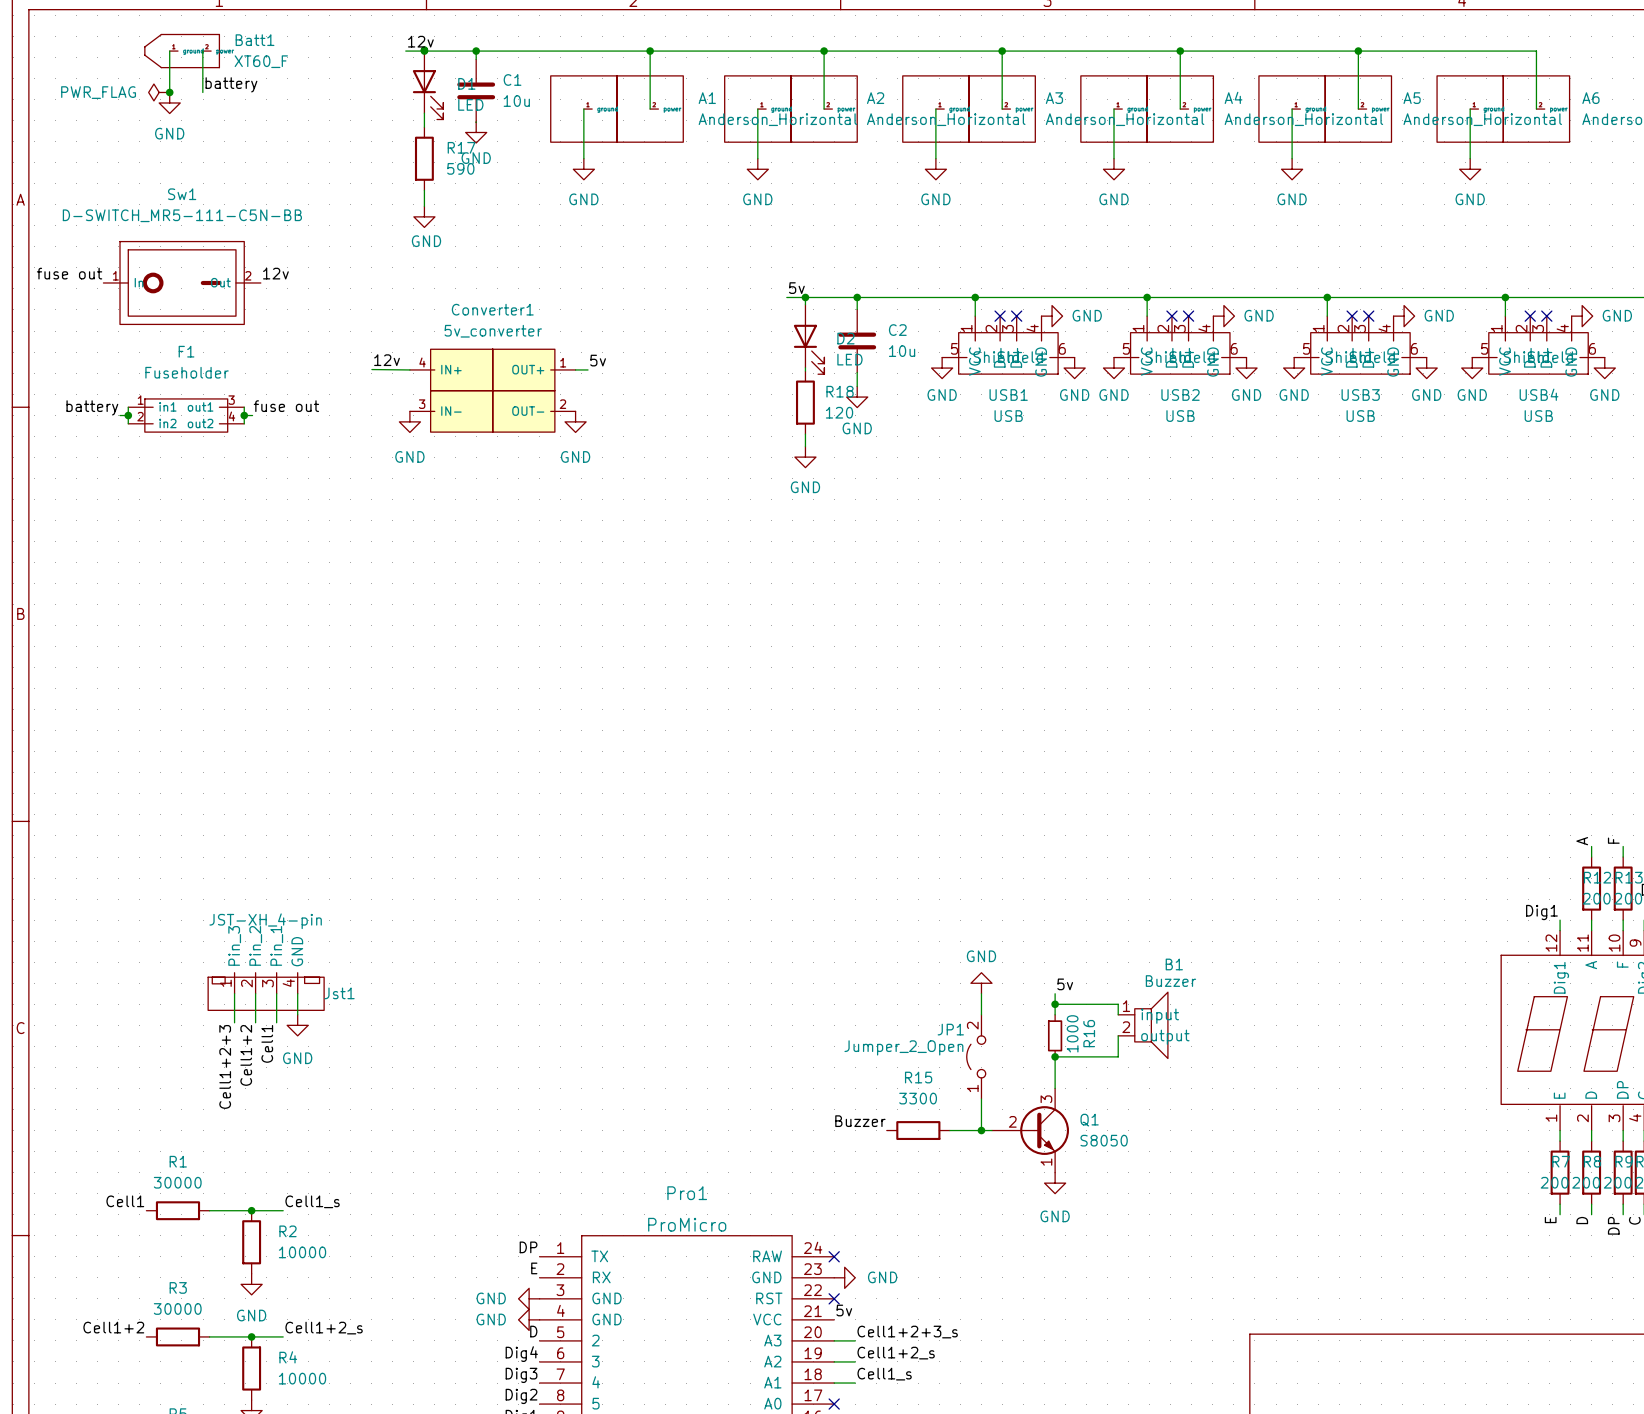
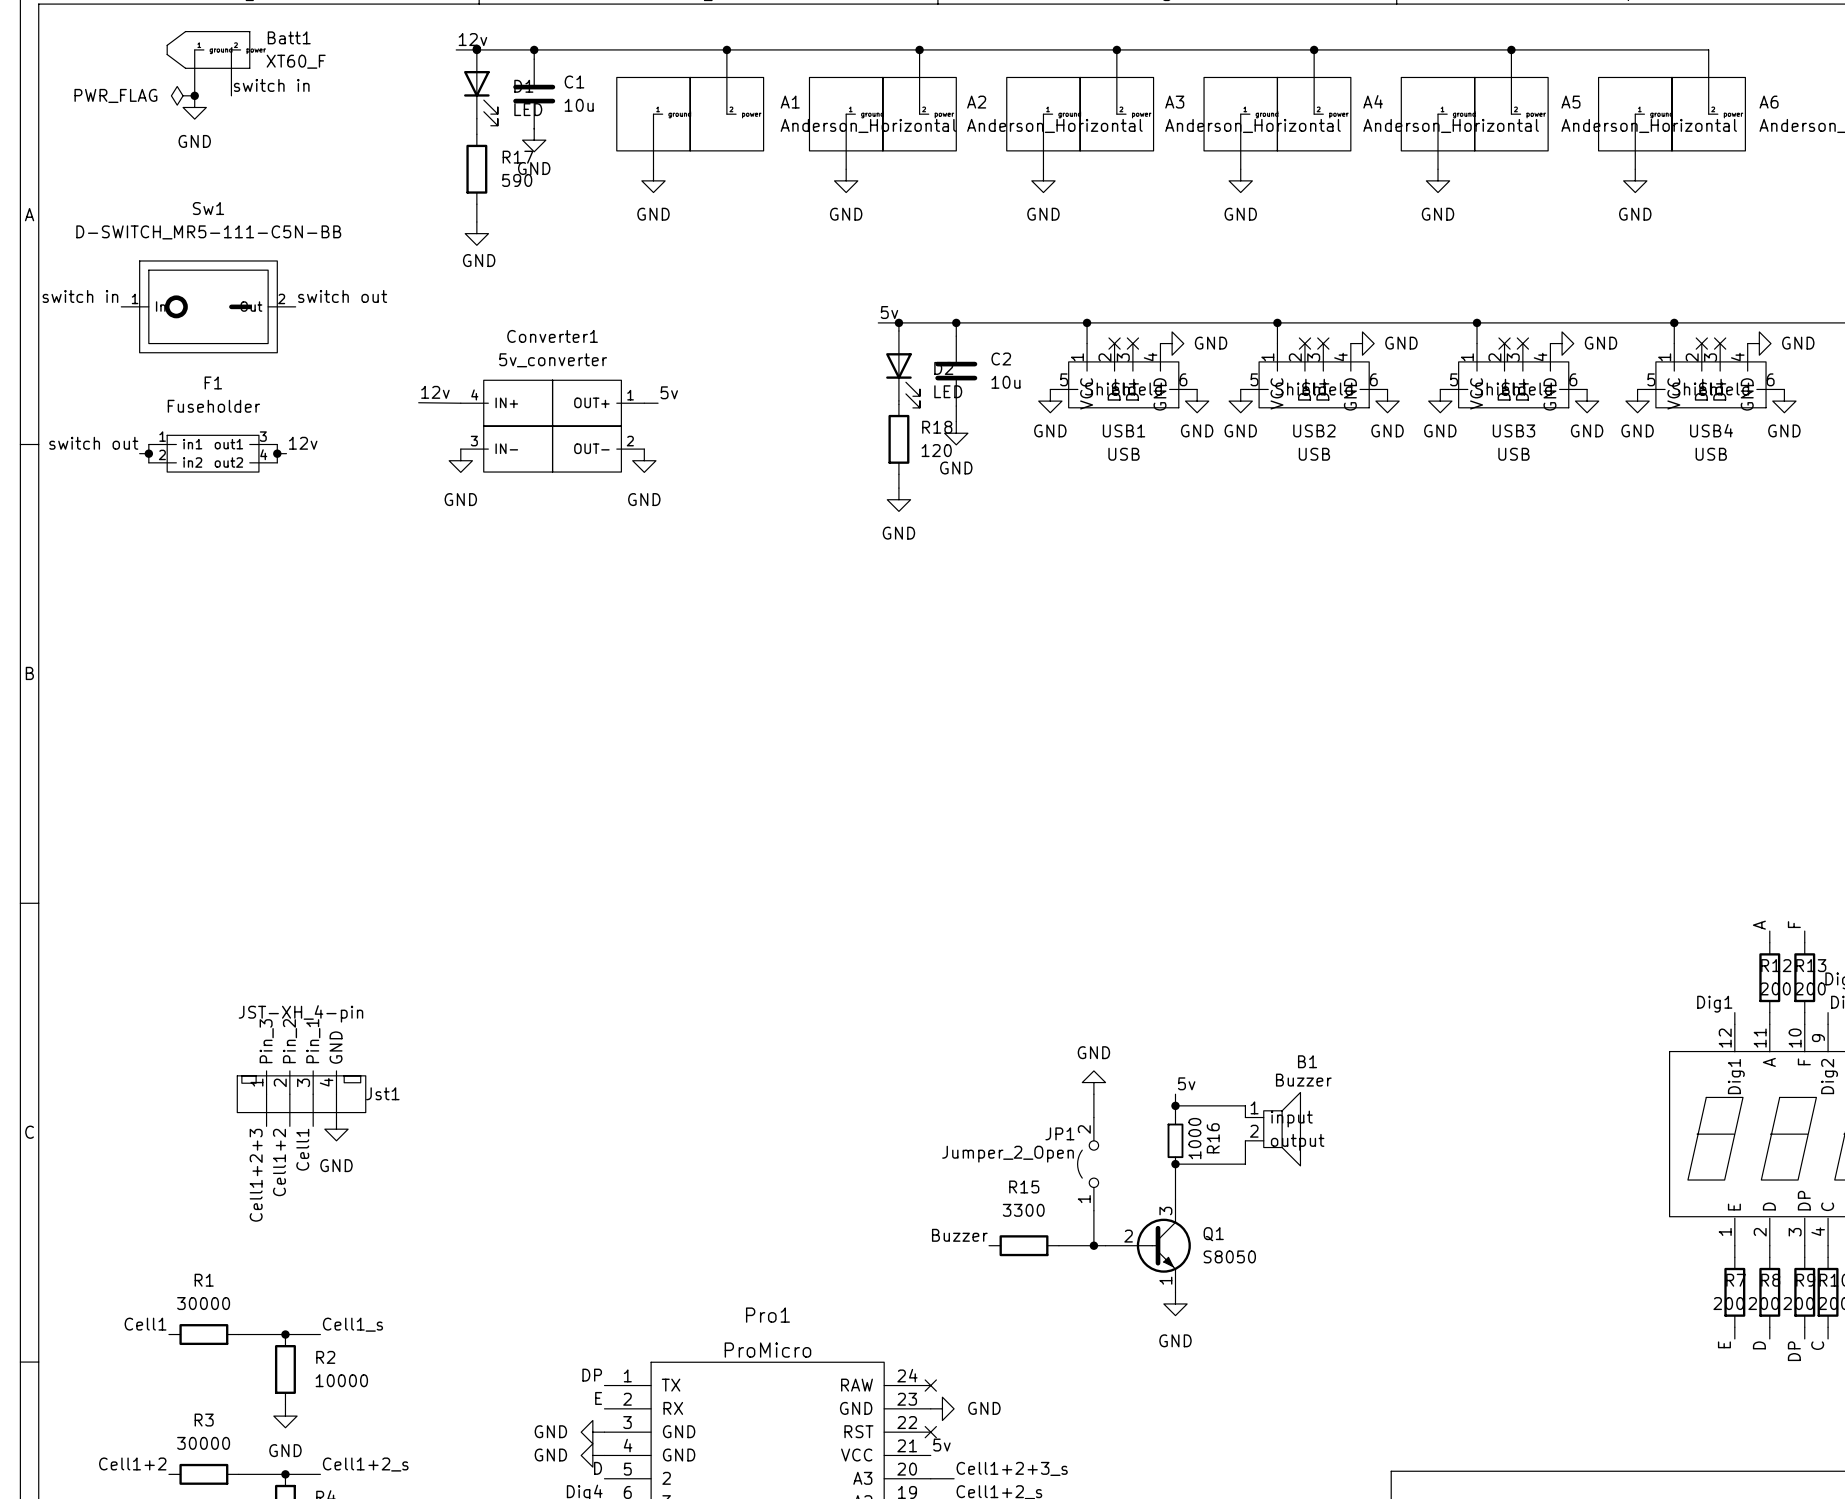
label: battery (231, 84) -> switch in (271, 85)
label: fuse out (69, 273) -> switch in (80, 296)
label: 12v (275, 273) -> switch out (342, 296)
label: fuse out (286, 406) -> 12v (303, 443)
label: battery (92, 407) -> switch out (93, 443)

